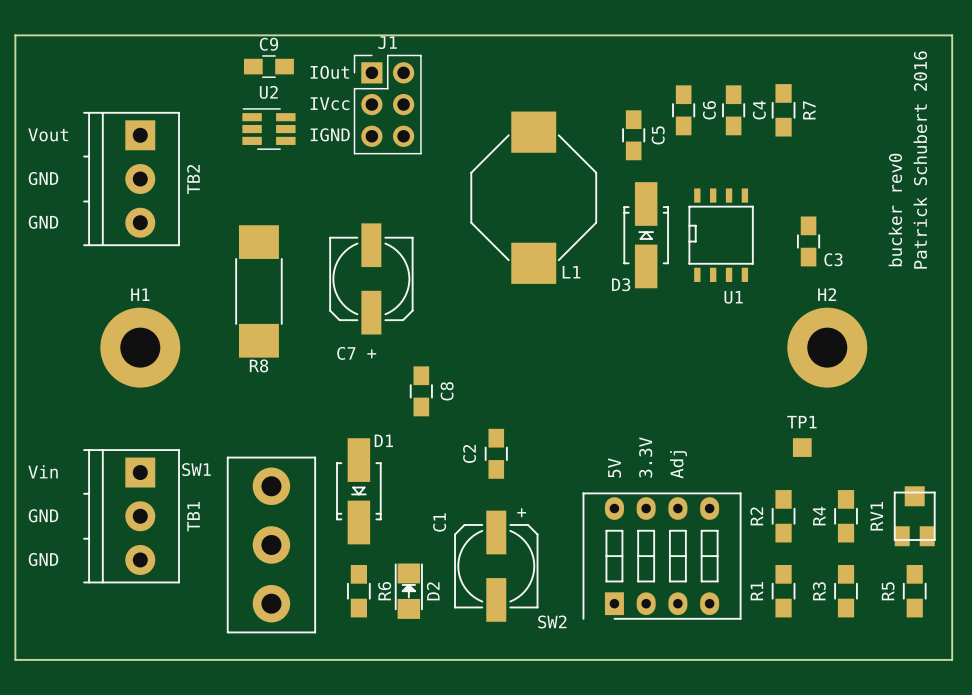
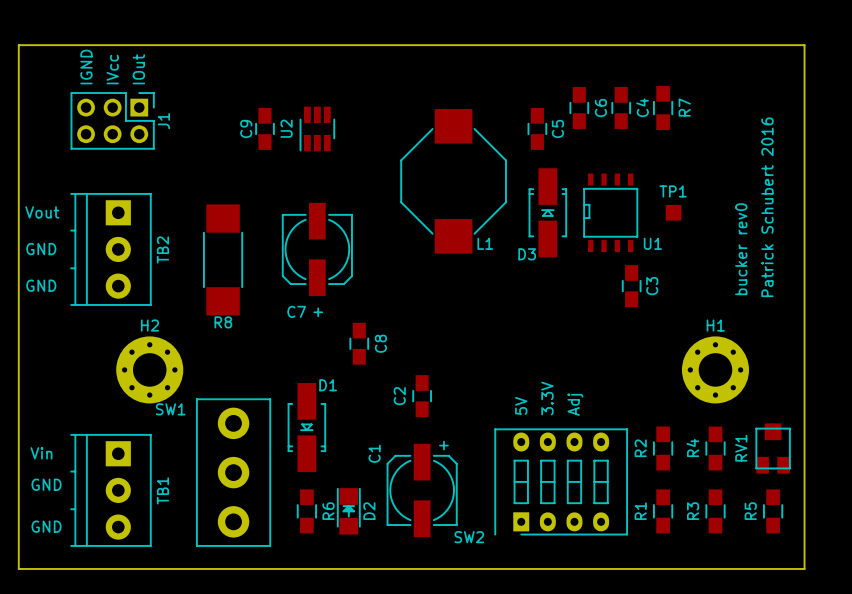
C9 name position: C9 (268, 44) -> C9 (246, 128)
C9 rotation: 0° (268, 66) -> 90° clockwise (264, 128)
C9 position: (268, 66) -> (264, 128)
text rotation: 0° (329, 72) -> 90° counterclockwise (138, 69)
text position: IOut (329, 72) -> IOut (138, 69)
text rotation: 0° (330, 103) -> 90° counterclockwise (112, 69)
text position: IVcc (330, 103) -> IVcc (112, 69)
J1 rotation: 0° (387, 104) -> 90° clockwise (112, 120)
J1 position: (387, 104) -> (112, 120)
U2 rotation: 0° (268, 129) -> 90° counterclockwise (317, 128)
U2 position: (268, 129) -> (317, 128)
text position: Vout (48, 134) -> Vout (42, 212)
text rotation: 0° (330, 134) -> 90° counterclockwise (86, 67)
text position: IGND (330, 134) -> IGND (86, 67)
text position: Patrick Schubert 2016 (920, 160) -> Patrick Schubert 2016 (767, 207)
text: GND (43, 178) -> none
TB2 position: (131, 179) -> (110, 249)
text position: bucker rev0 (895, 209) -> bucker rev0 (741, 249)
text: GND (43, 222) -> none
C3 position: (808, 241) -> (631, 286)
C3 name rotation: 0° (833, 259) -> 90° counterclockwise (652, 286)
text: none -> GND (41, 249)
U1 name position: U1 (733, 297) -> U1 (652, 243)
H1 footprint: [100, 307, 181, 388] -> [681, 336, 750, 404]
H2 footprint: [787, 307, 868, 388] -> [116, 336, 184, 404]
text: none -> GND (41, 285)
TP1 position: (802, 447) -> (673, 212)
text position: Vin (43, 471) -> Vin (41, 453)
text position: GND (43, 515) -> GND (46, 526)
TB1 position: (131, 516) -> (110, 490)

